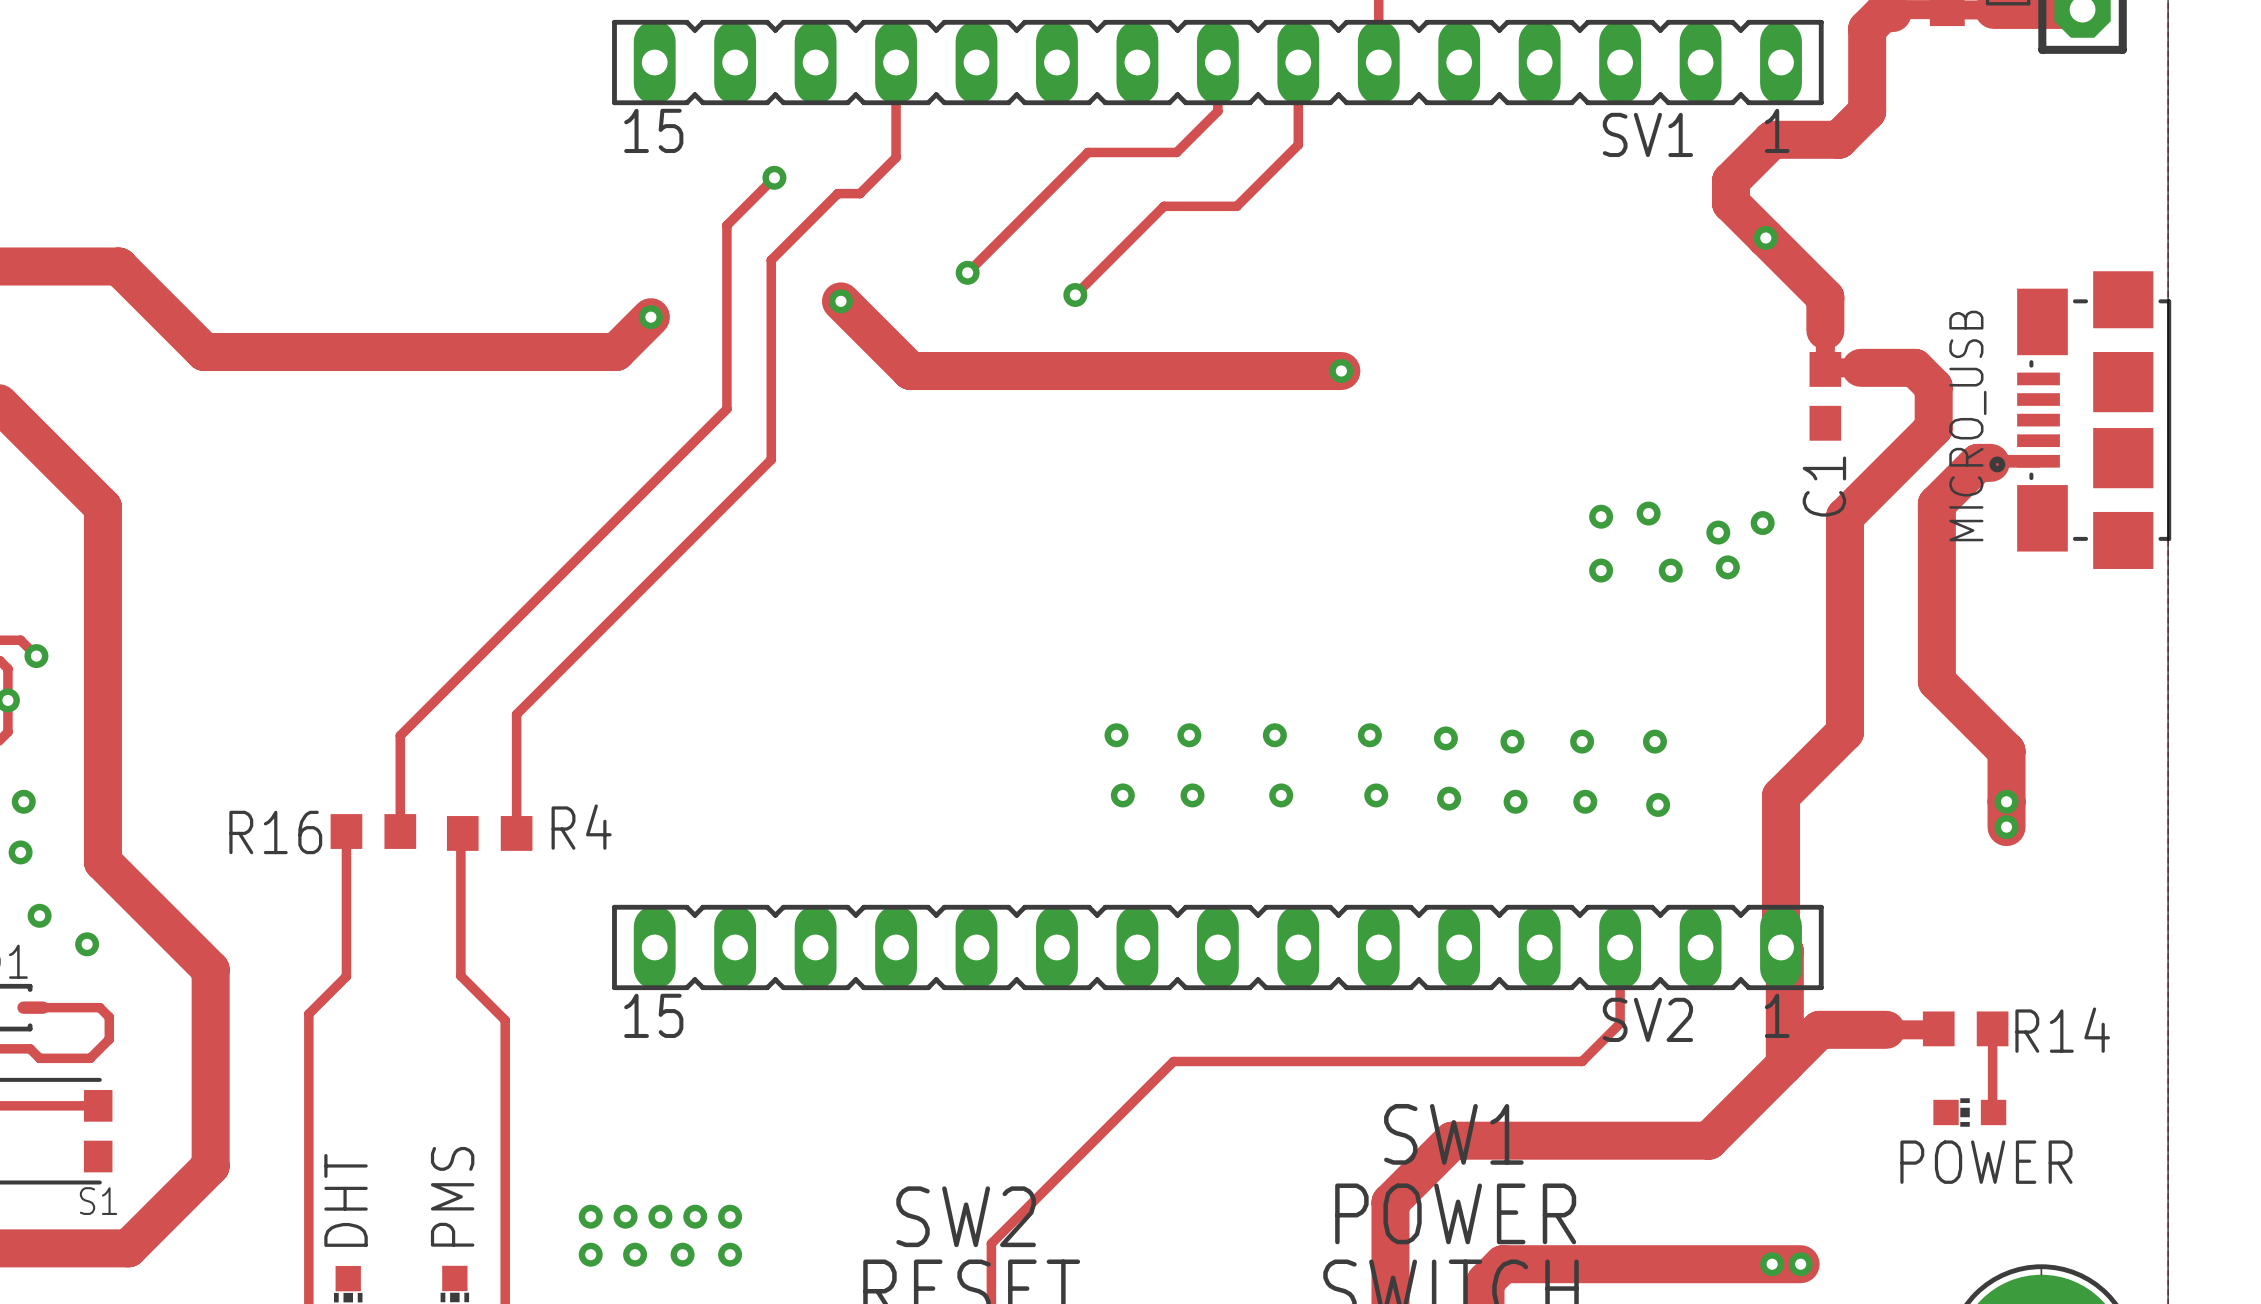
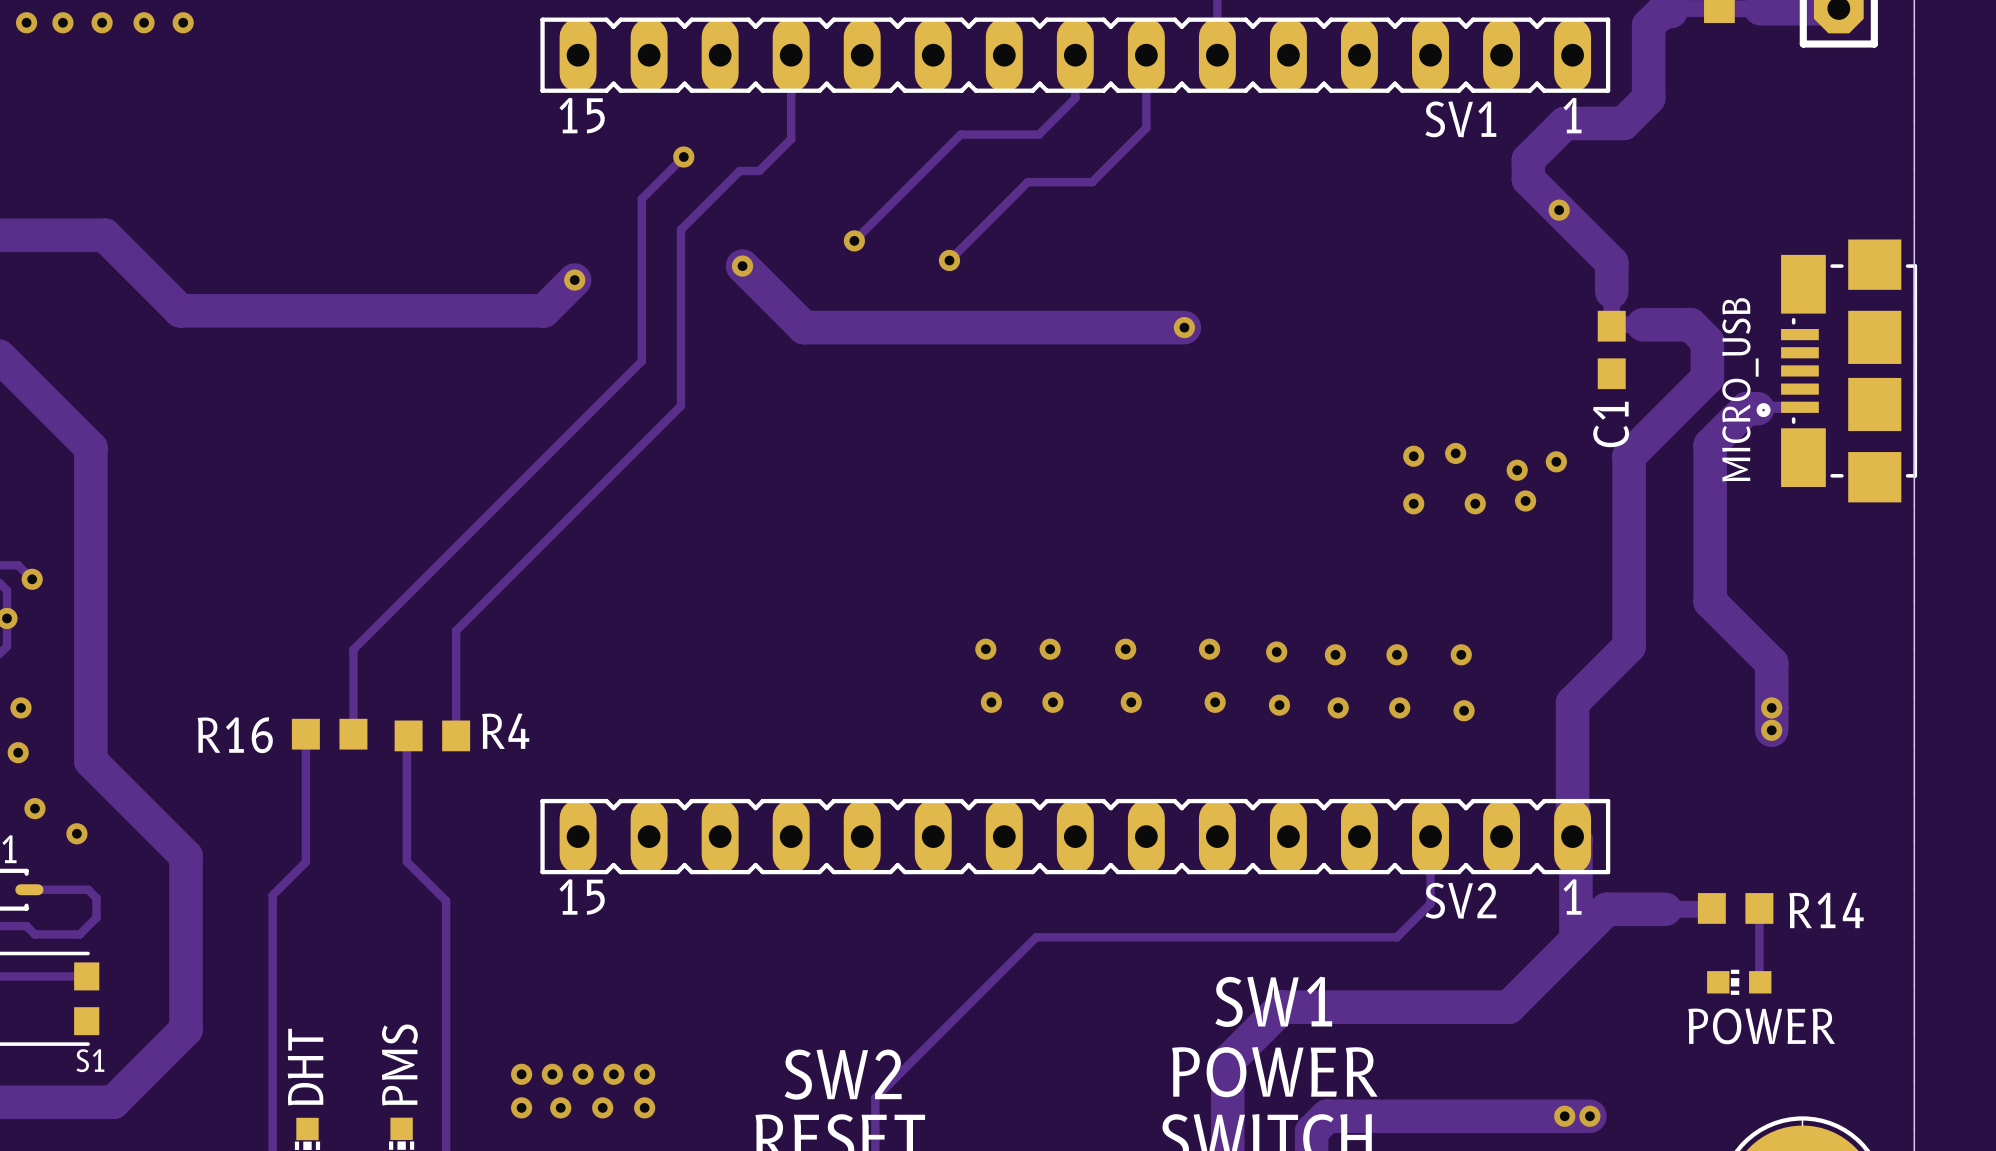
via: none -> (26, 22)
via: none -> (62, 22)
via: none -> (102, 22)
via: none -> (144, 22)
via: none -> (183, 22)

